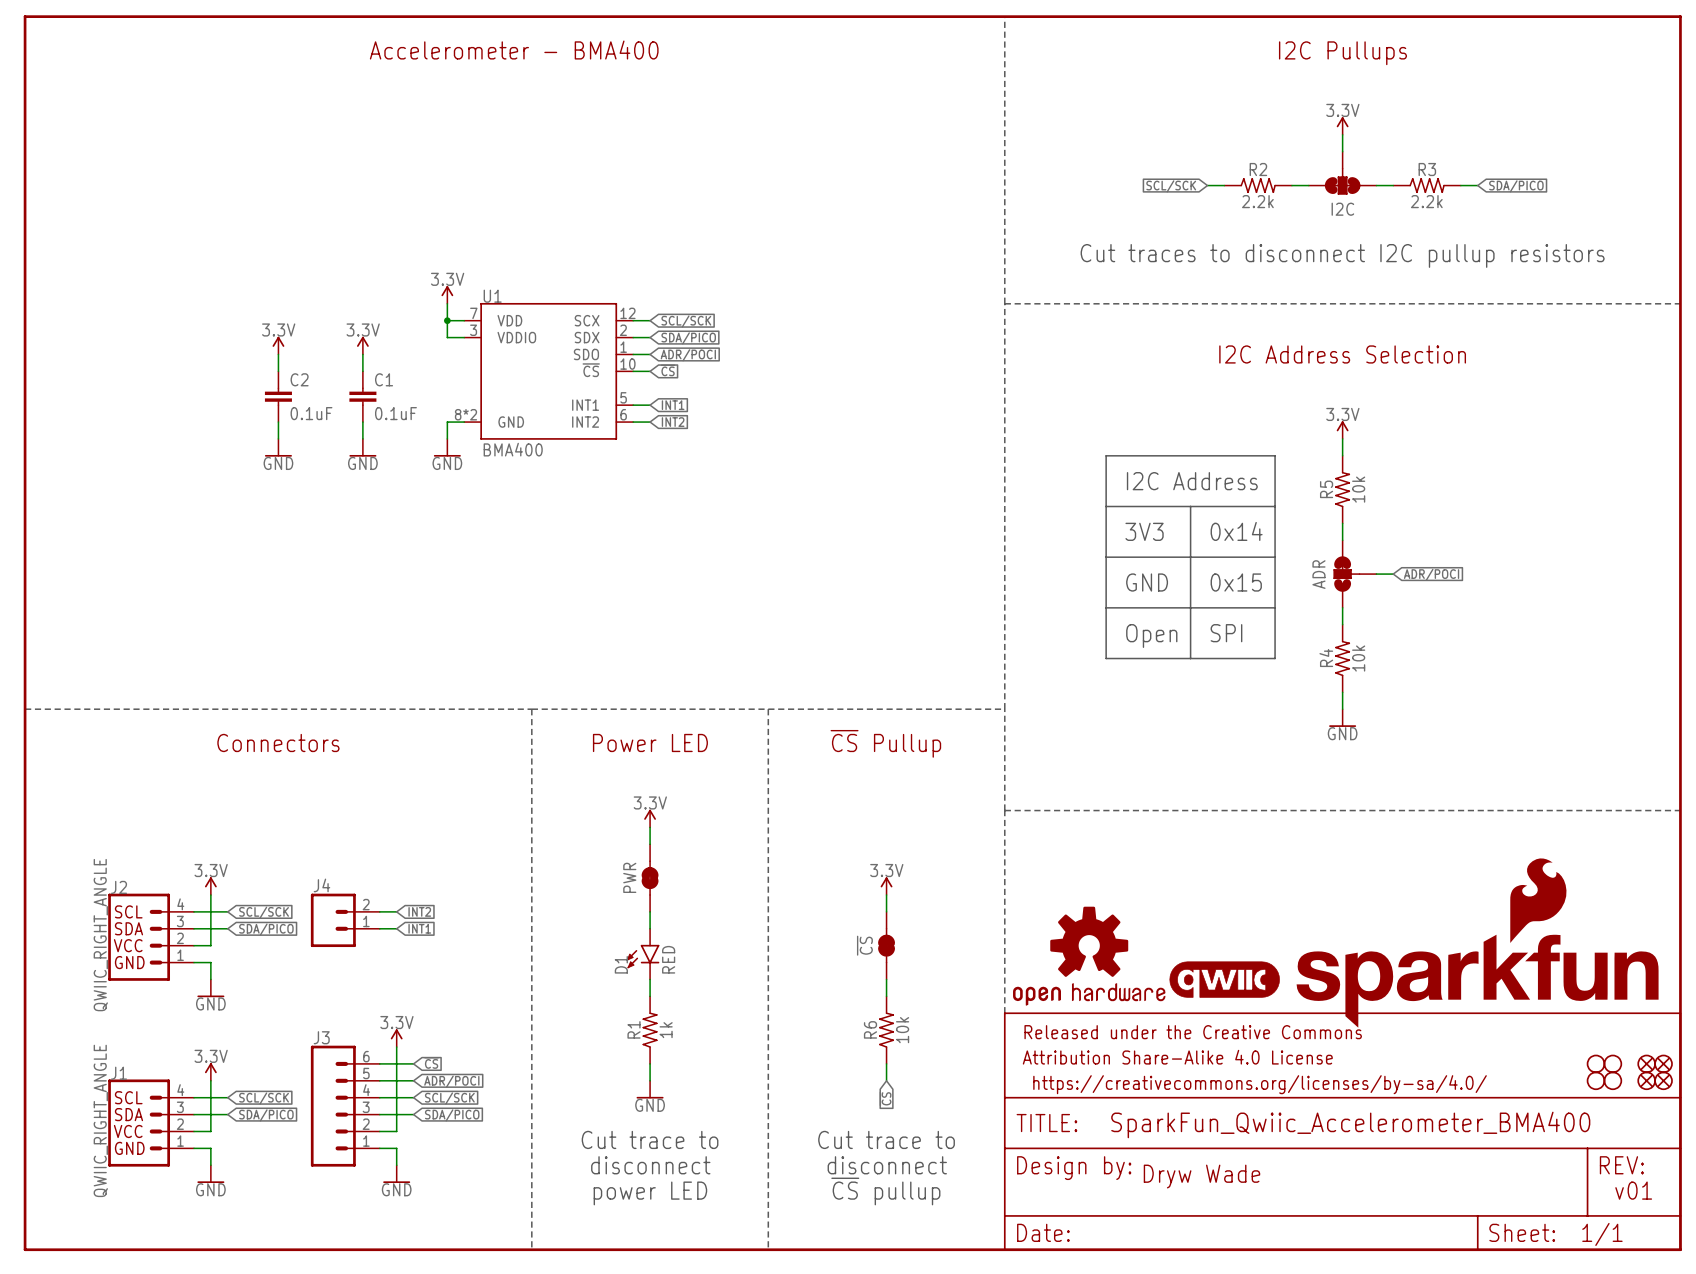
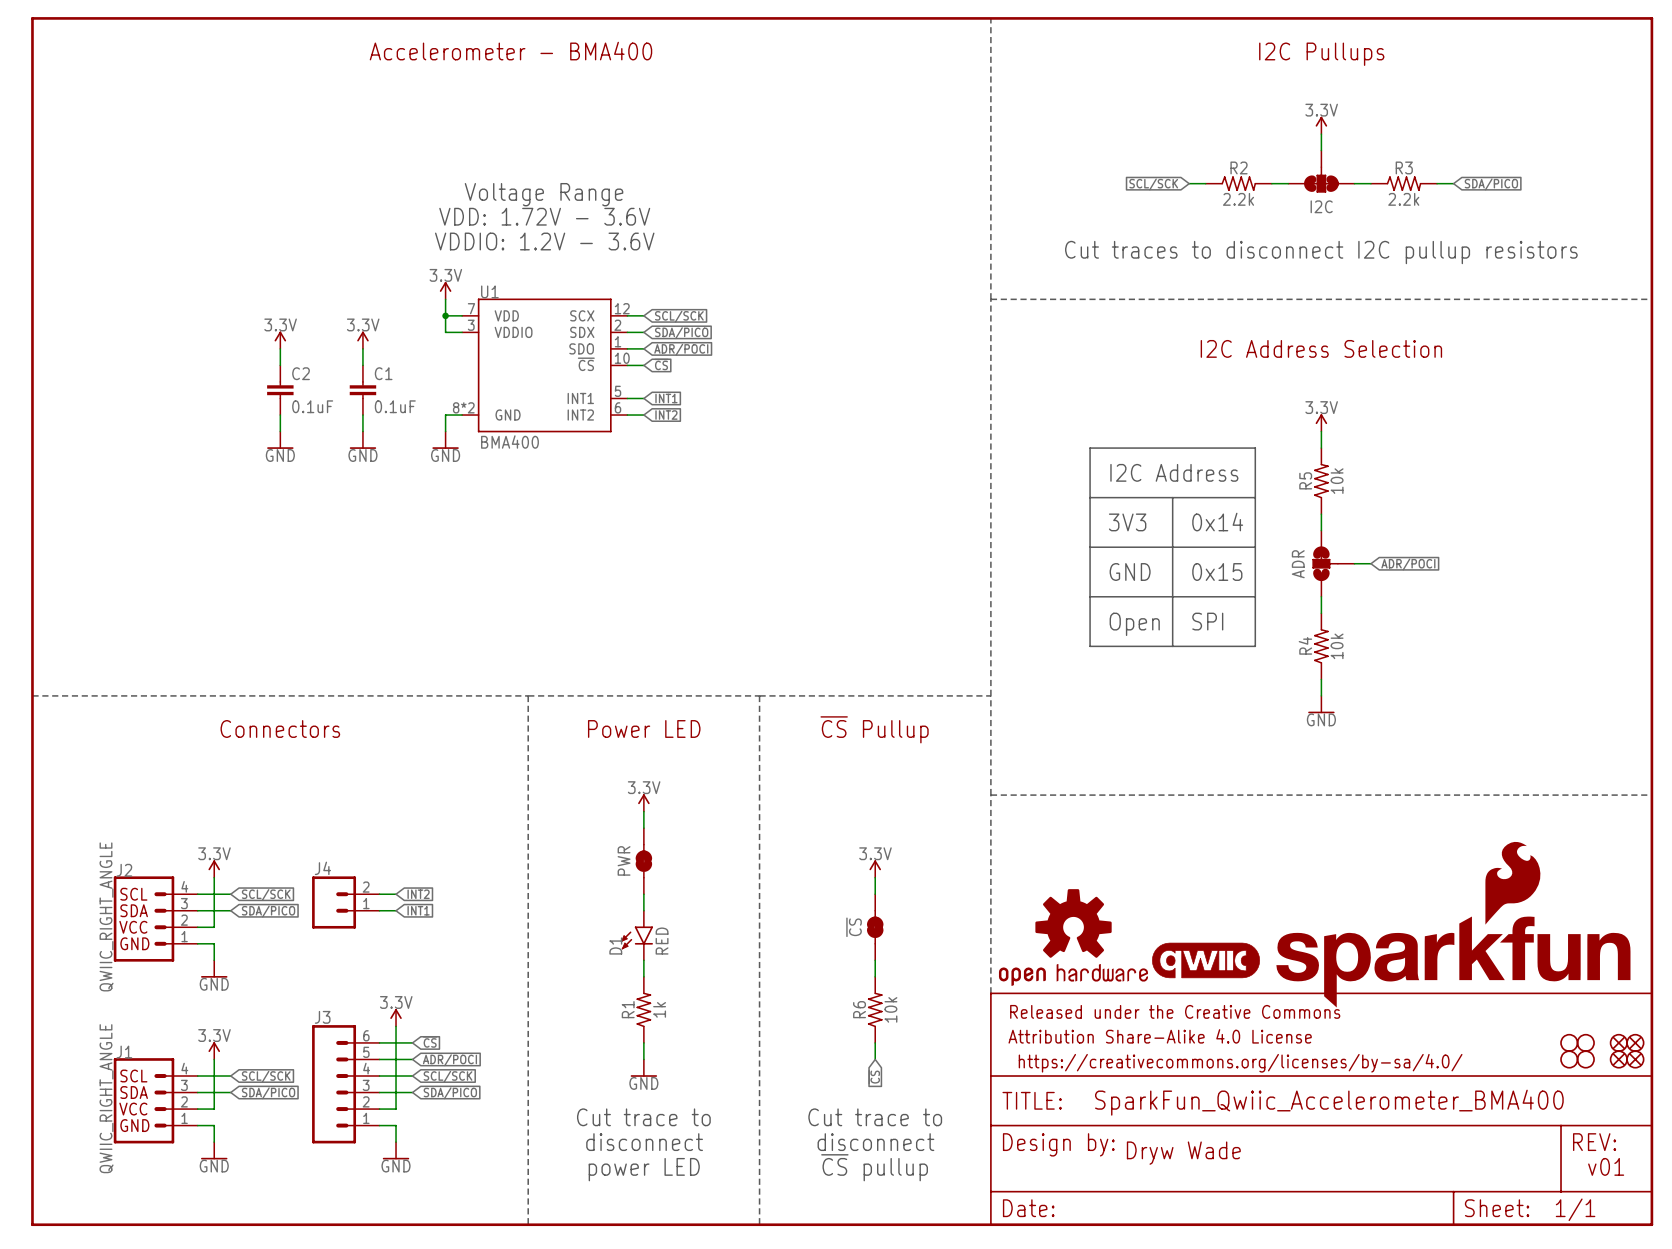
text: none -> Voltage Range (544, 194)
text: none -> VDD: 1.72V - 3.6V (544, 216)
text: none -> VDDIO: 1.2V - 3.6V (544, 241)

